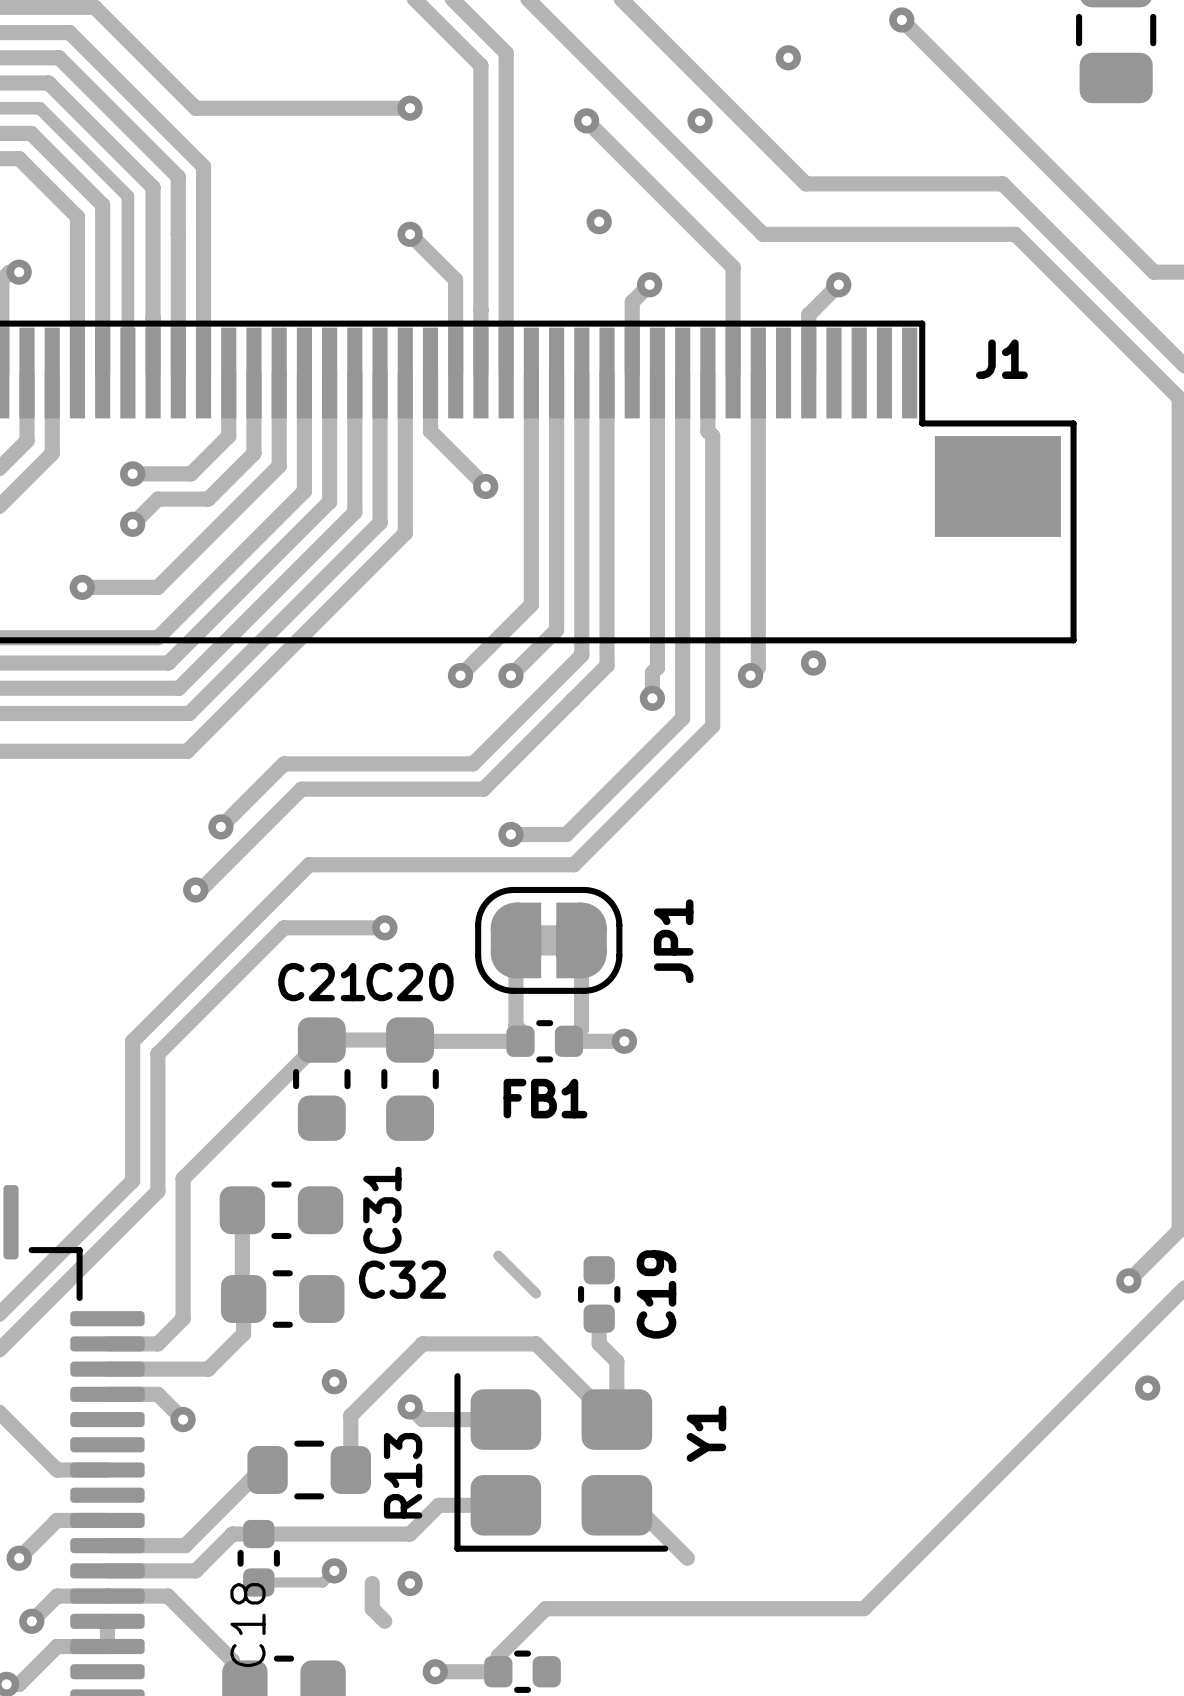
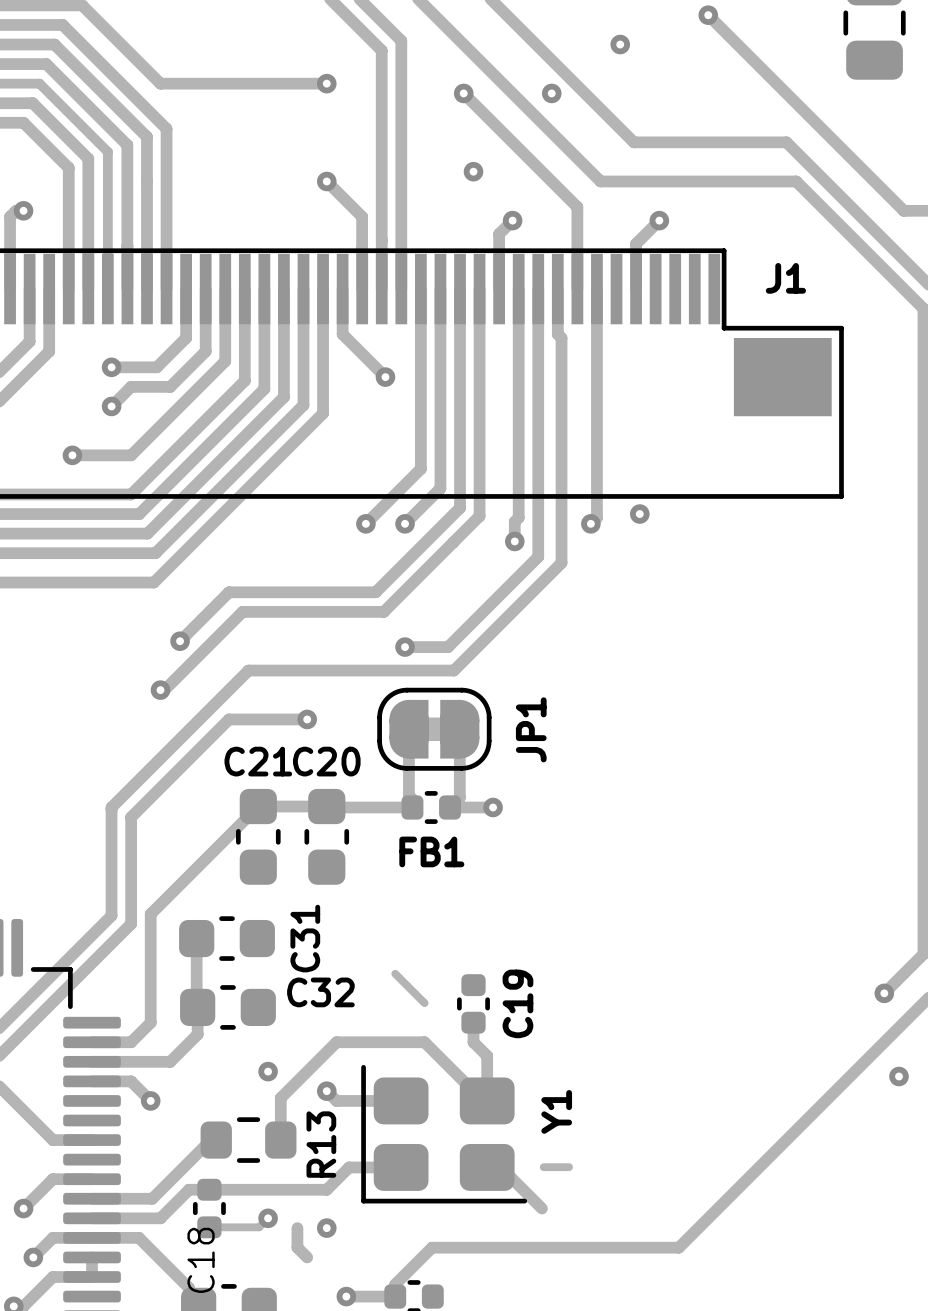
track: none -> (543, 1167) (569, 1167)

